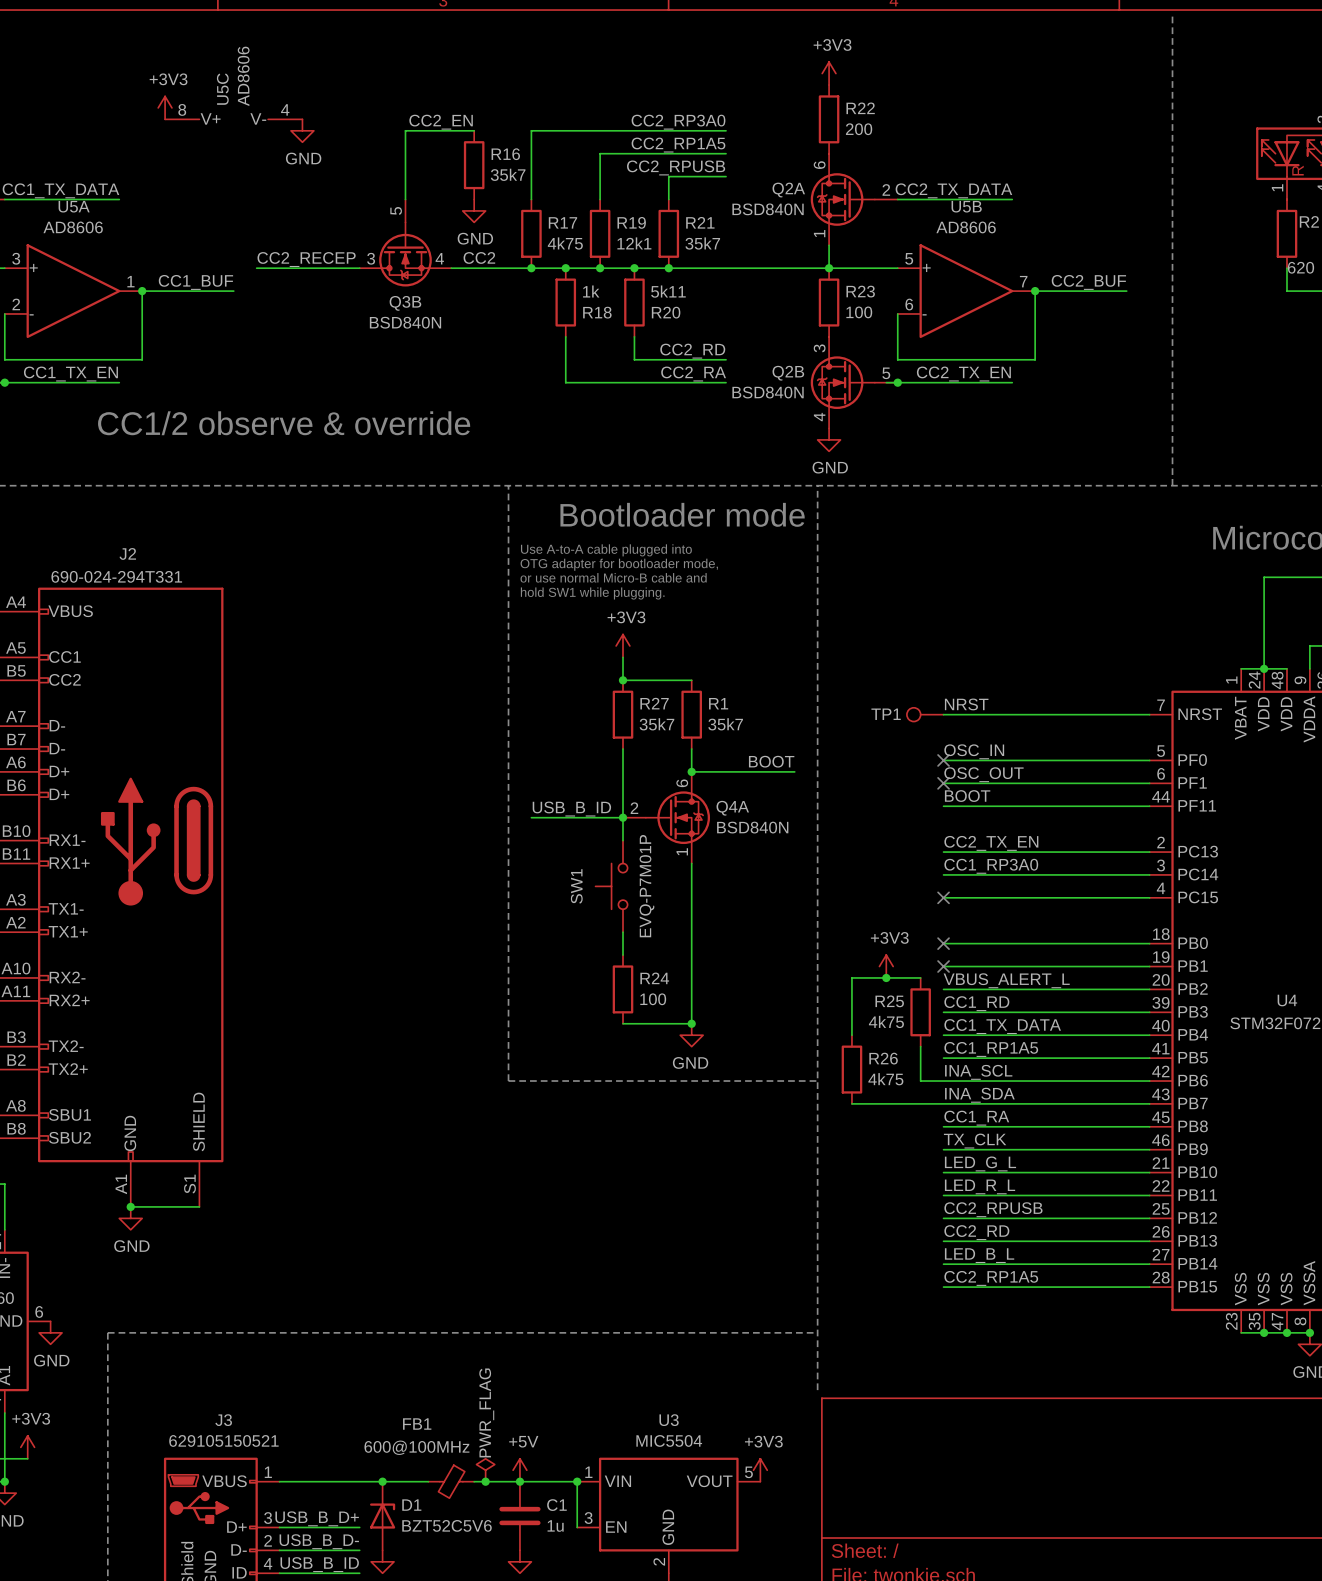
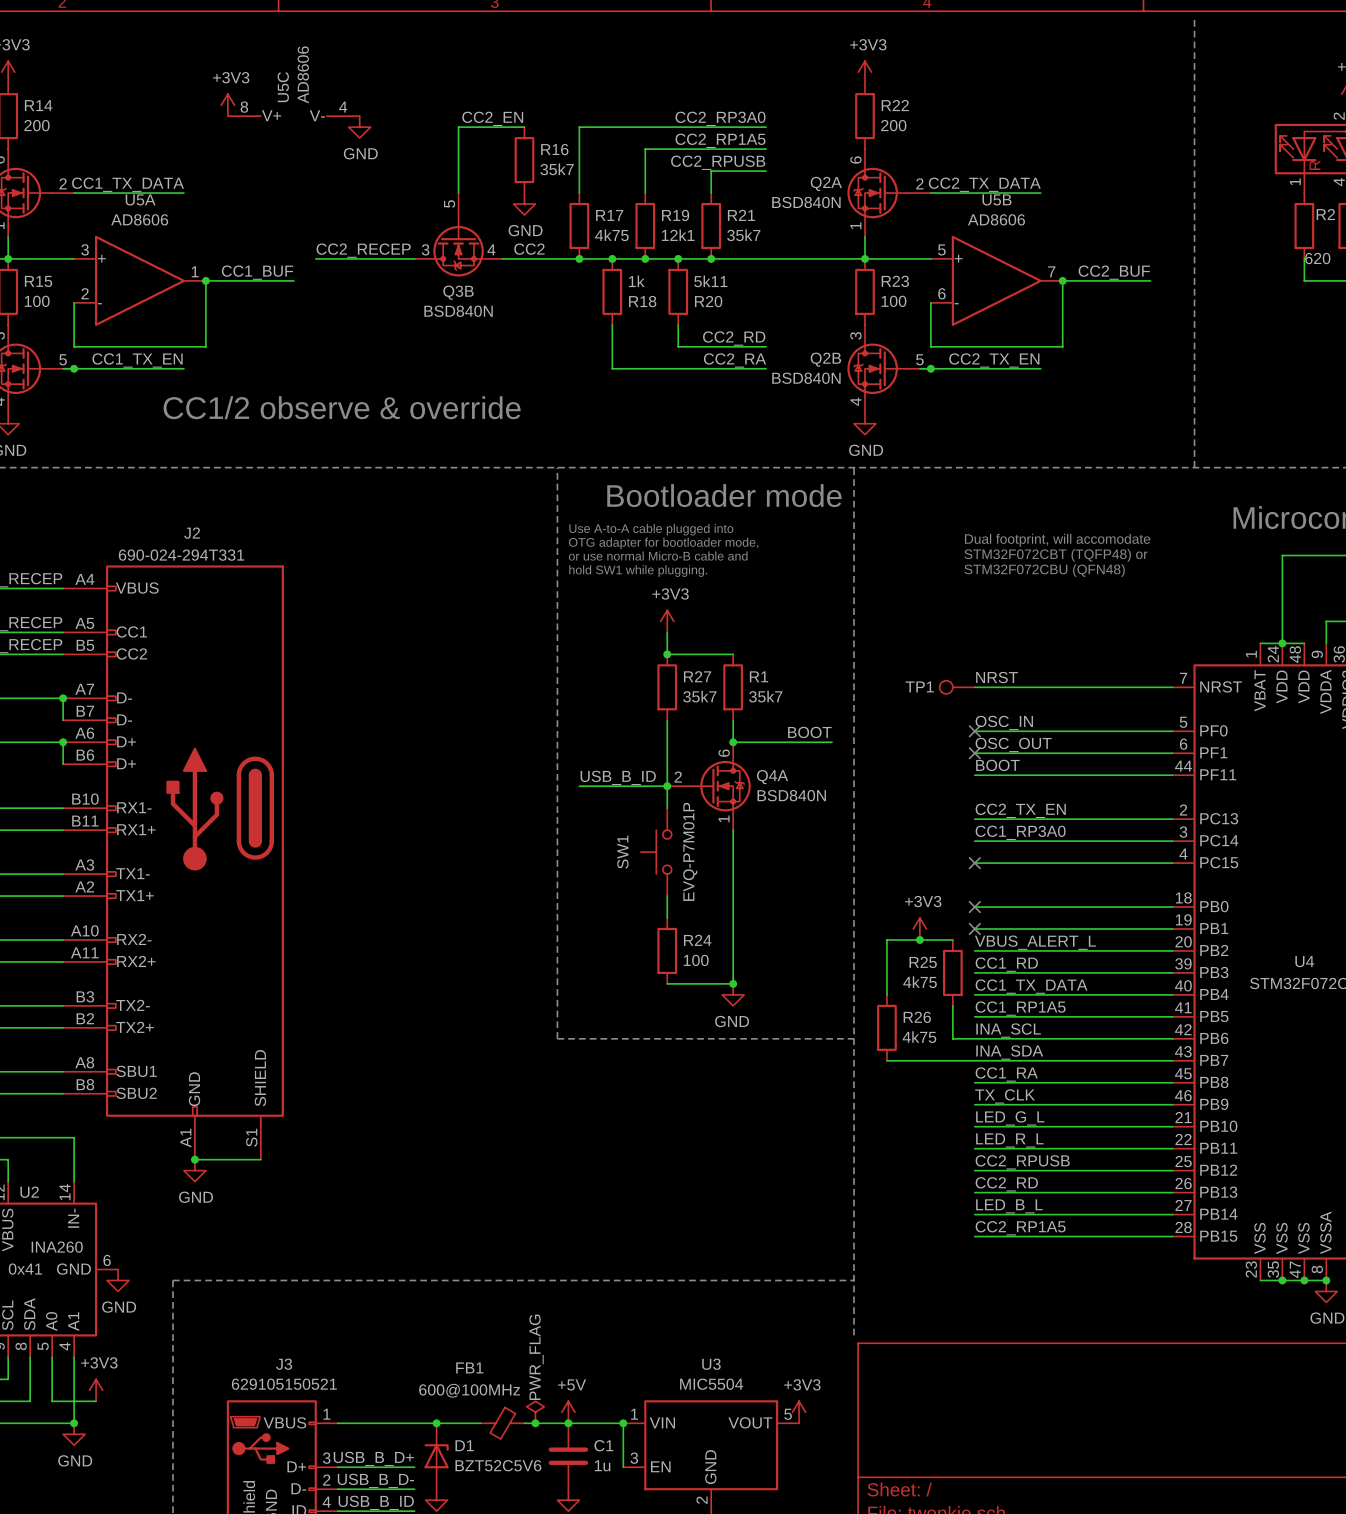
text: none -> Dual footprint, will accomodate (1057, 540)
text: none -> STM32F072CBT (TQFP48) or (1055, 555)
text: none -> STM32F072CBU (QFN48) (1044, 570)

